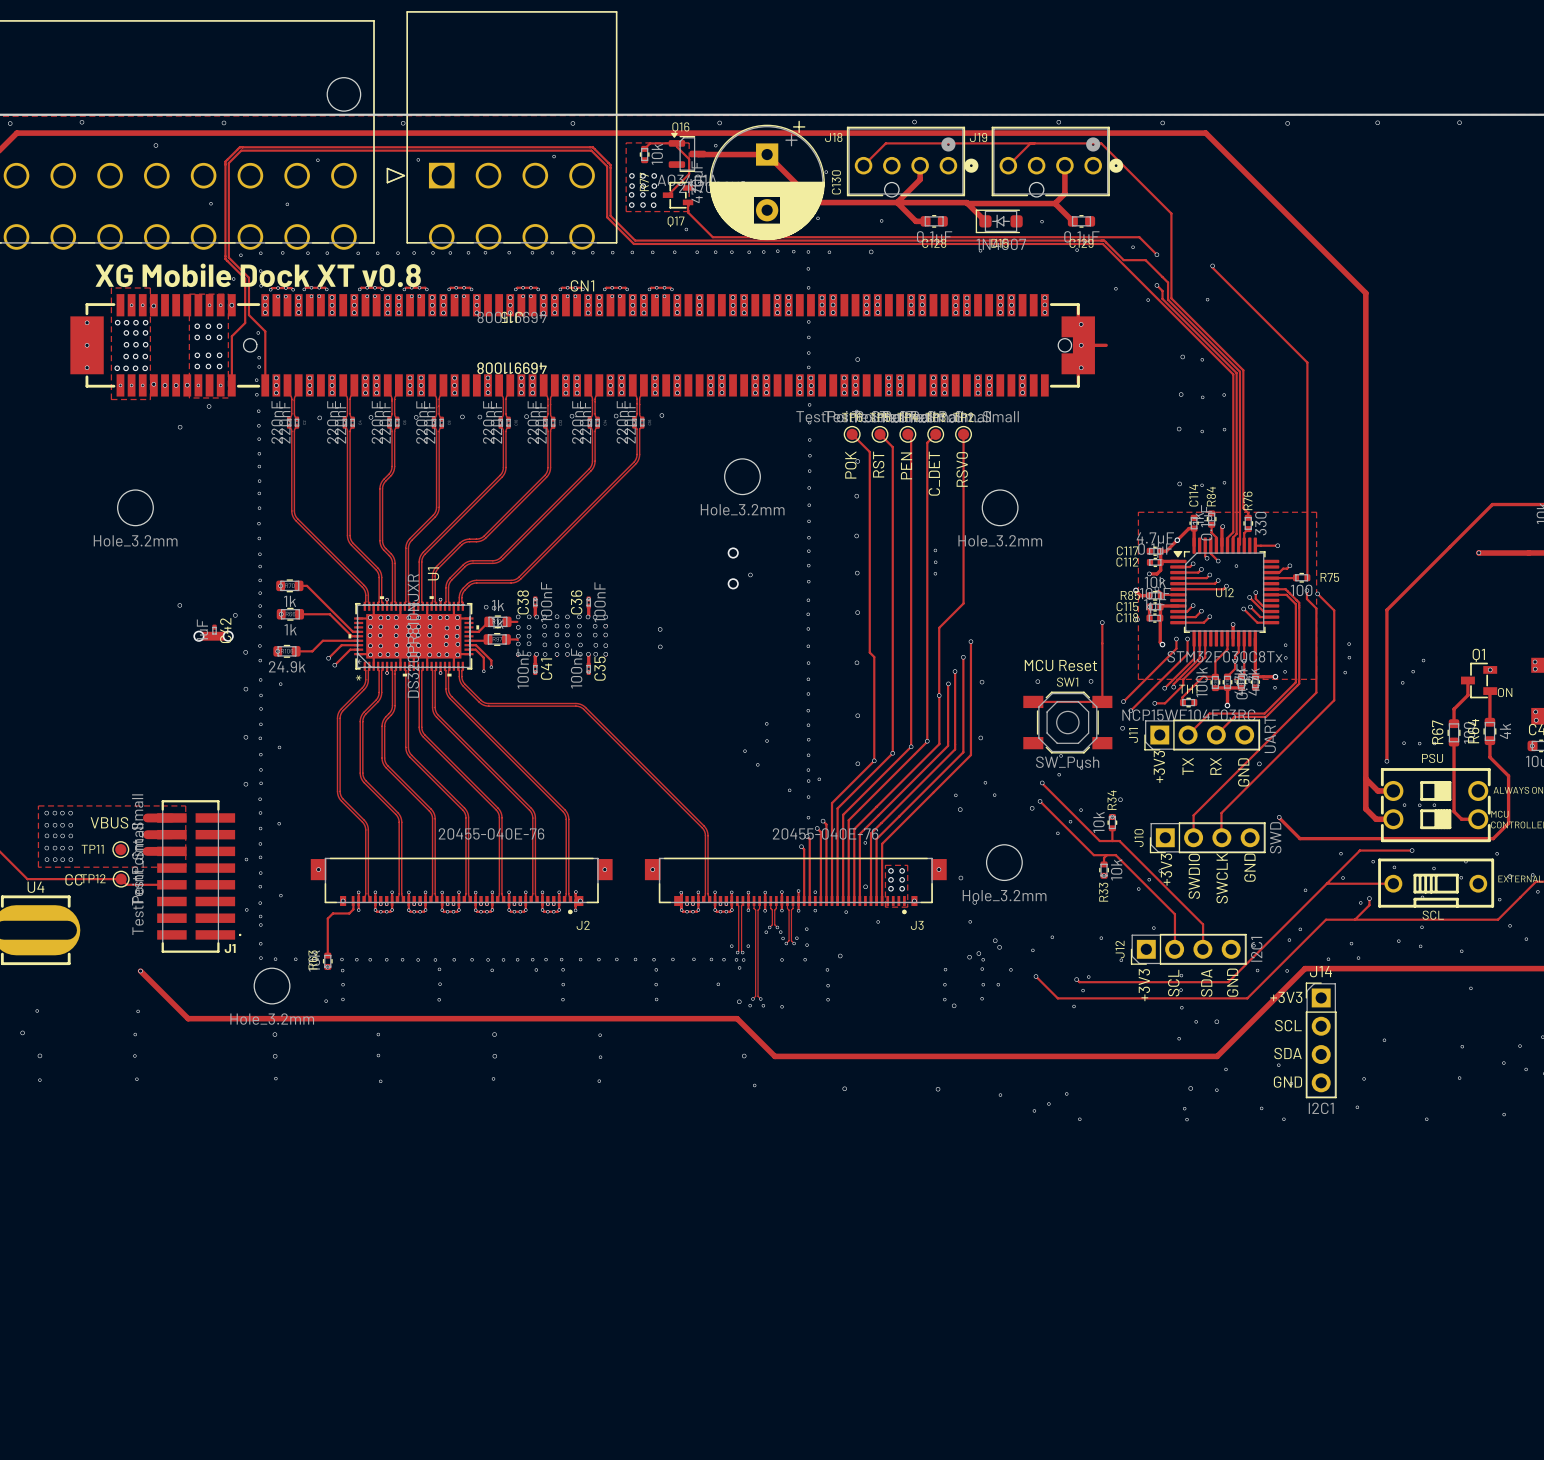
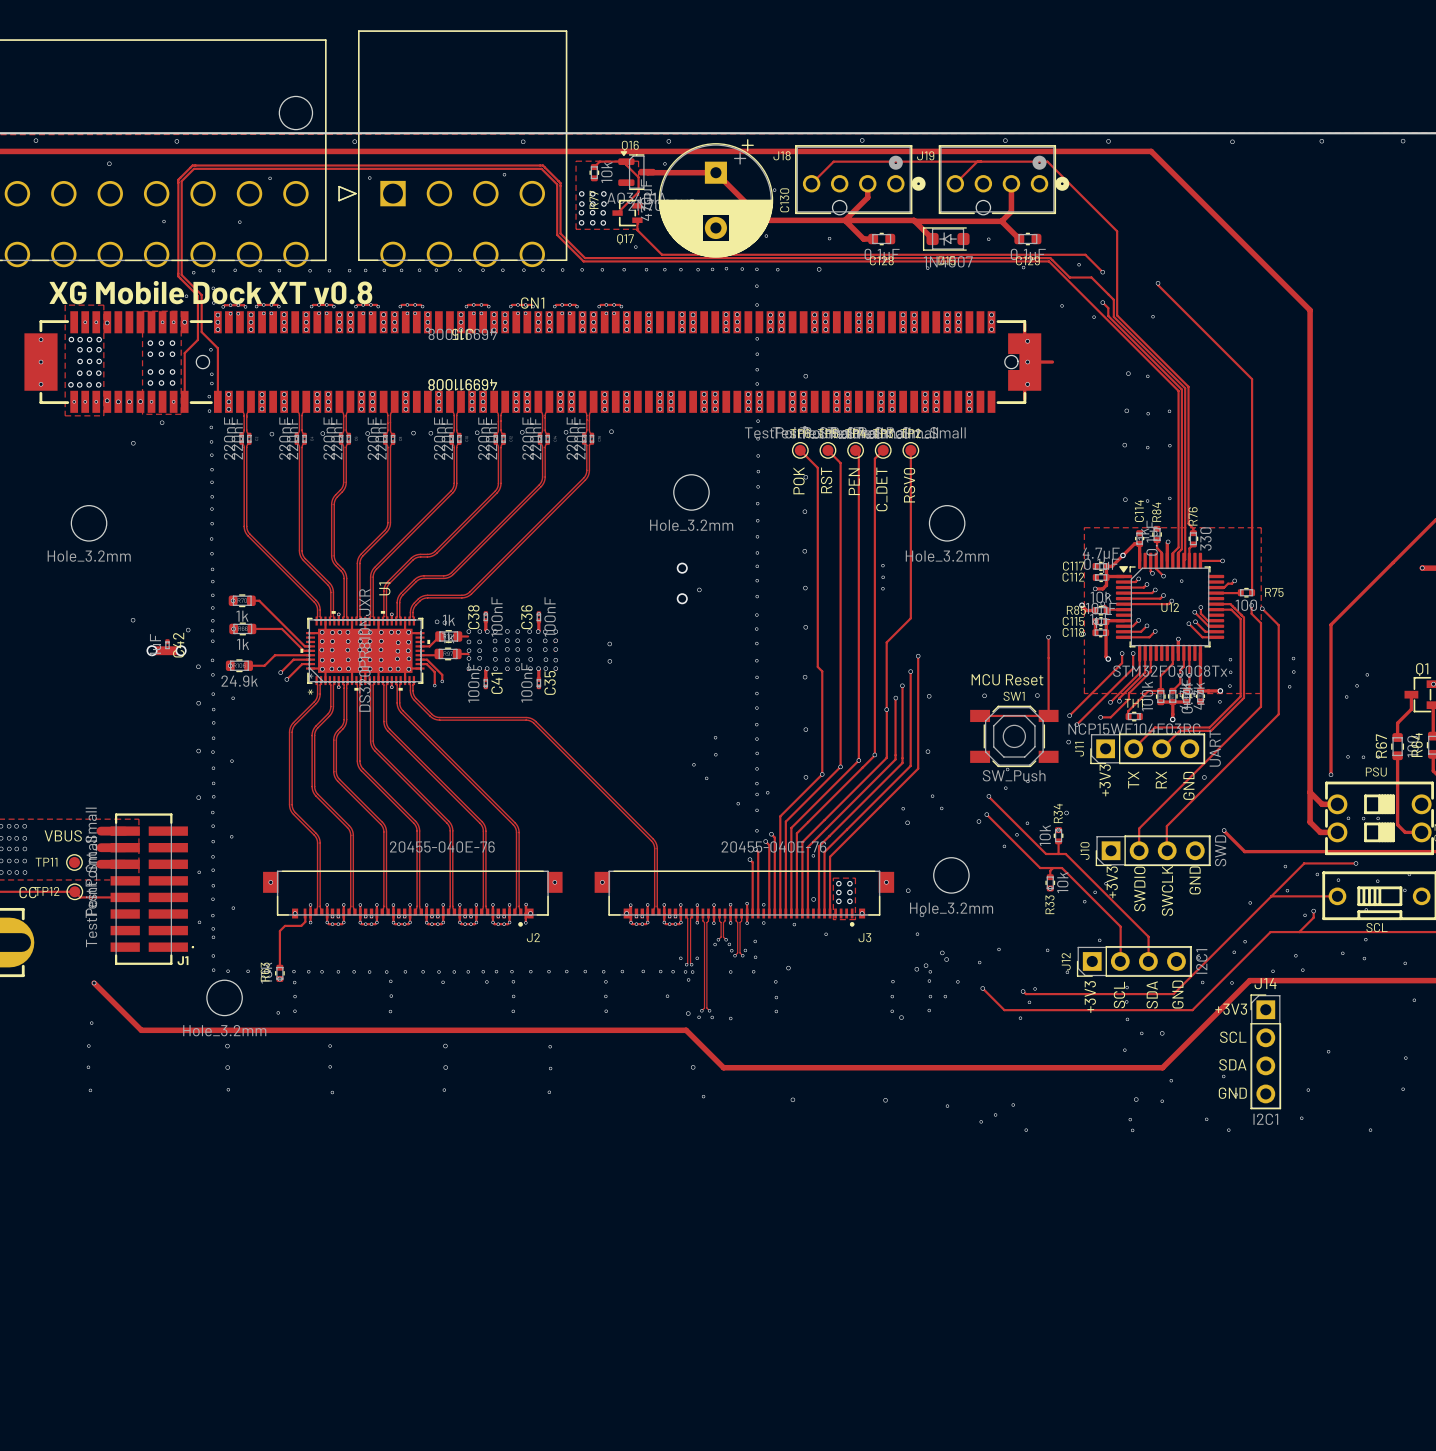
via: none -> (626, 913)

